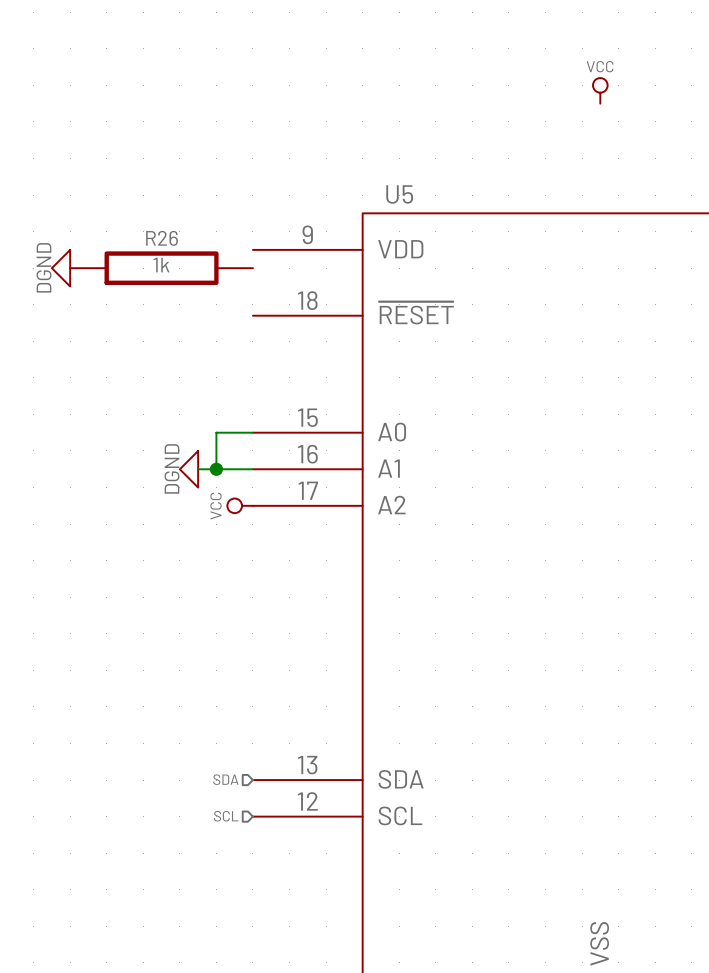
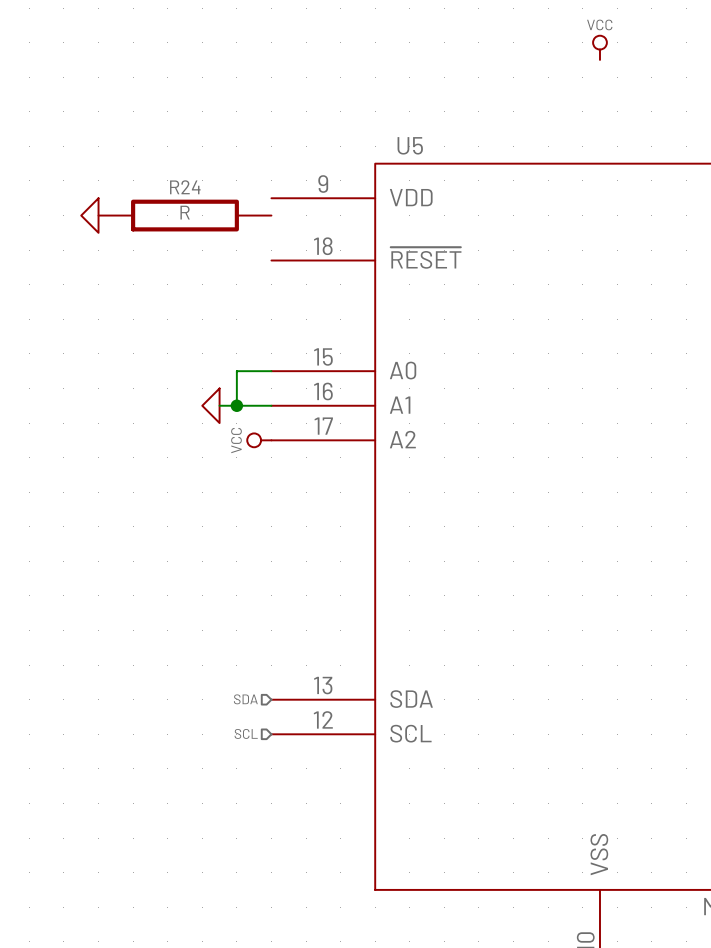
R26 name: R26 (162, 238) -> R24 (185, 187)
R26 value: 1k (161, 265) -> R (185, 212)
power symbol text: DGND (44, 267) -> none
power symbol text: DGND (171, 468) -> none

